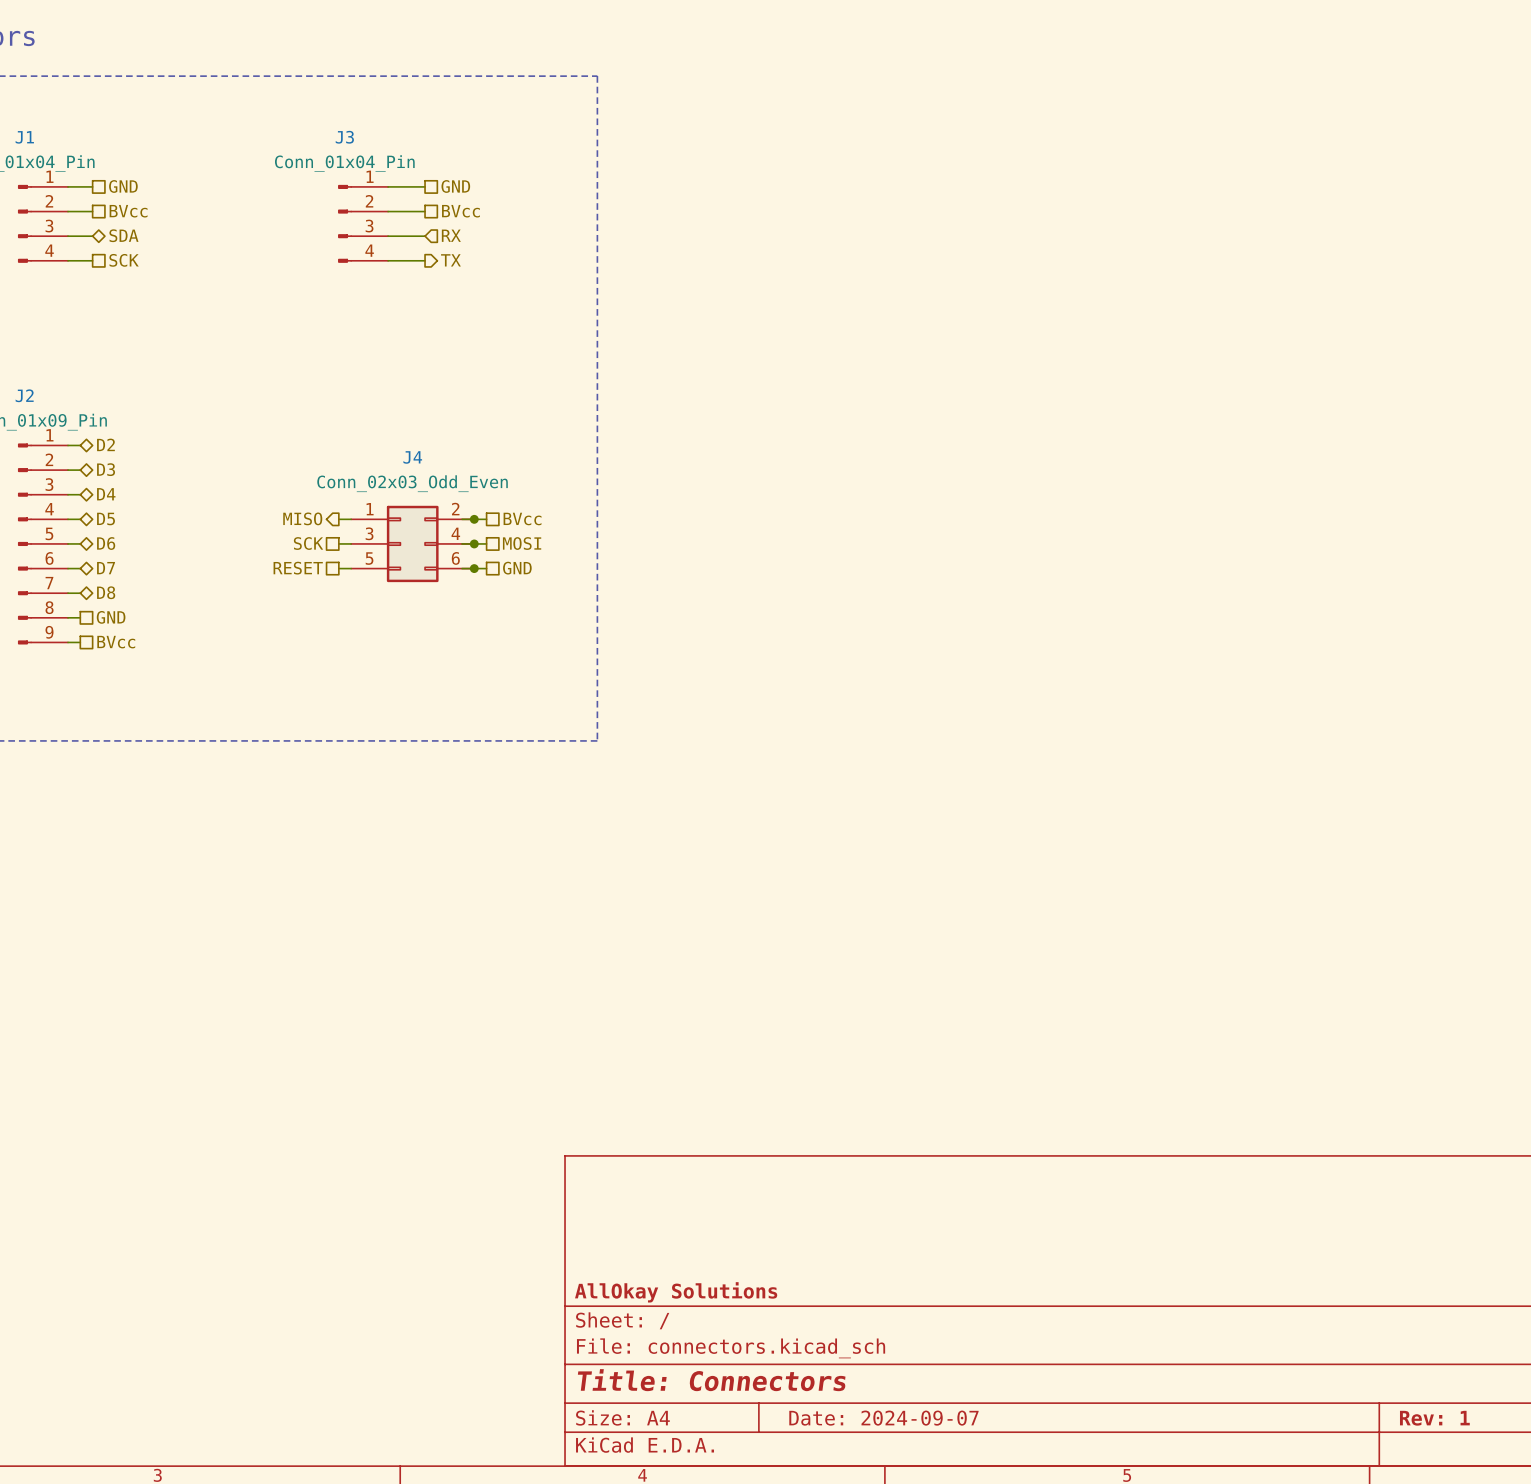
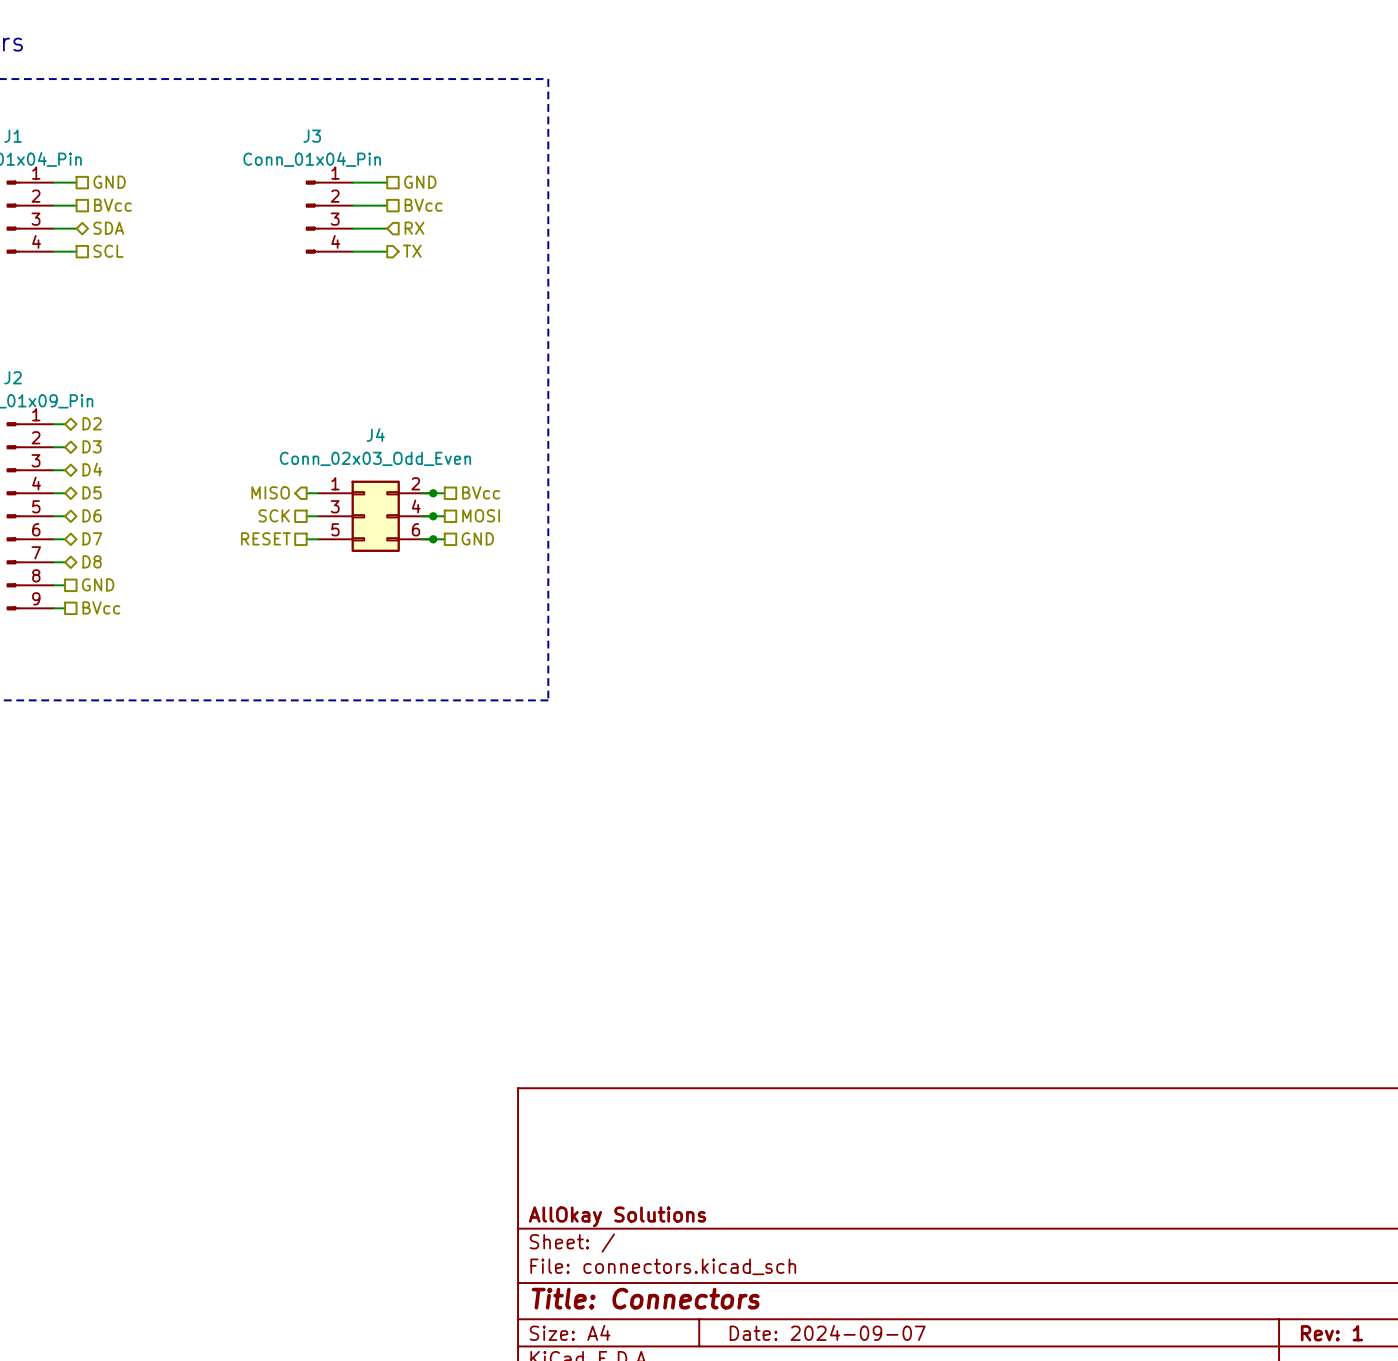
hierarchical label: SCK (124, 260) -> SCL (108, 251)

